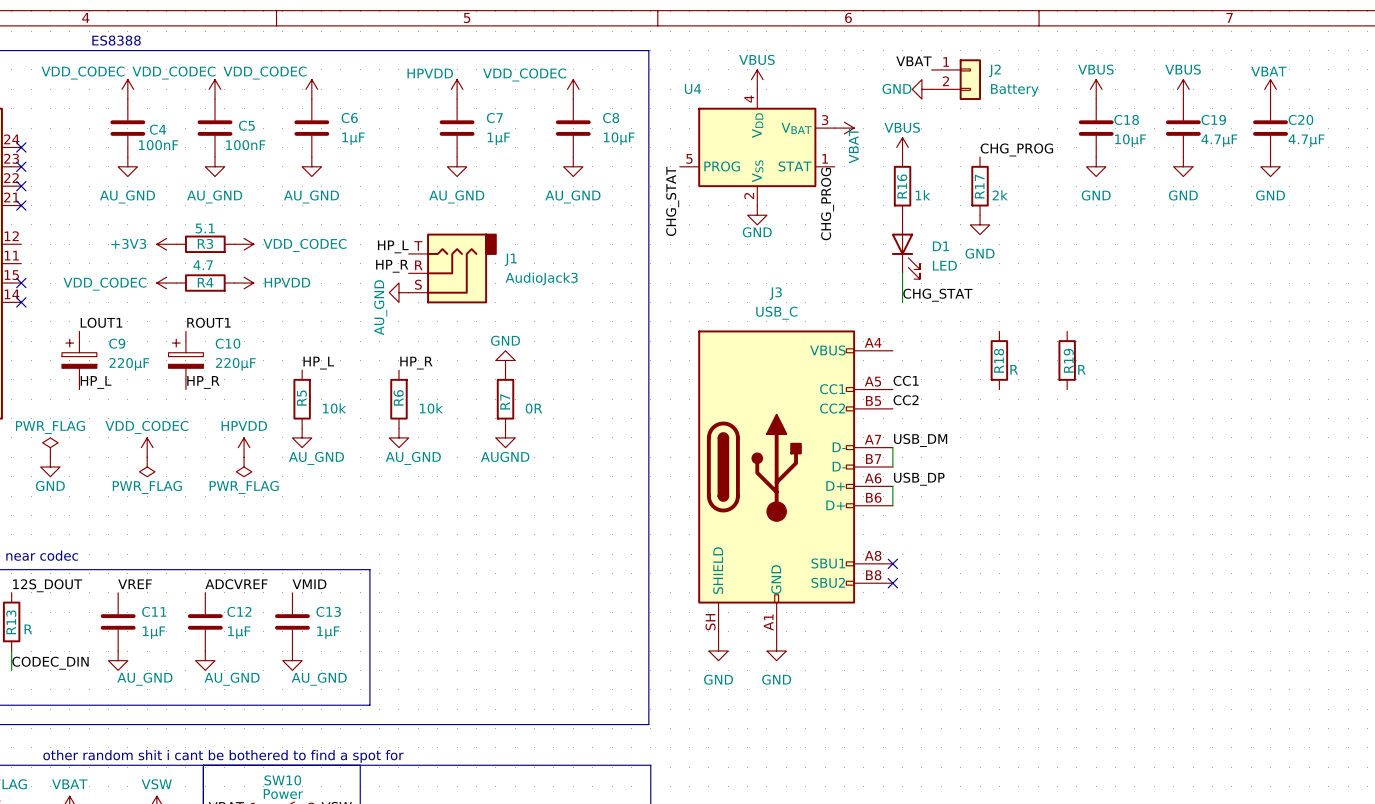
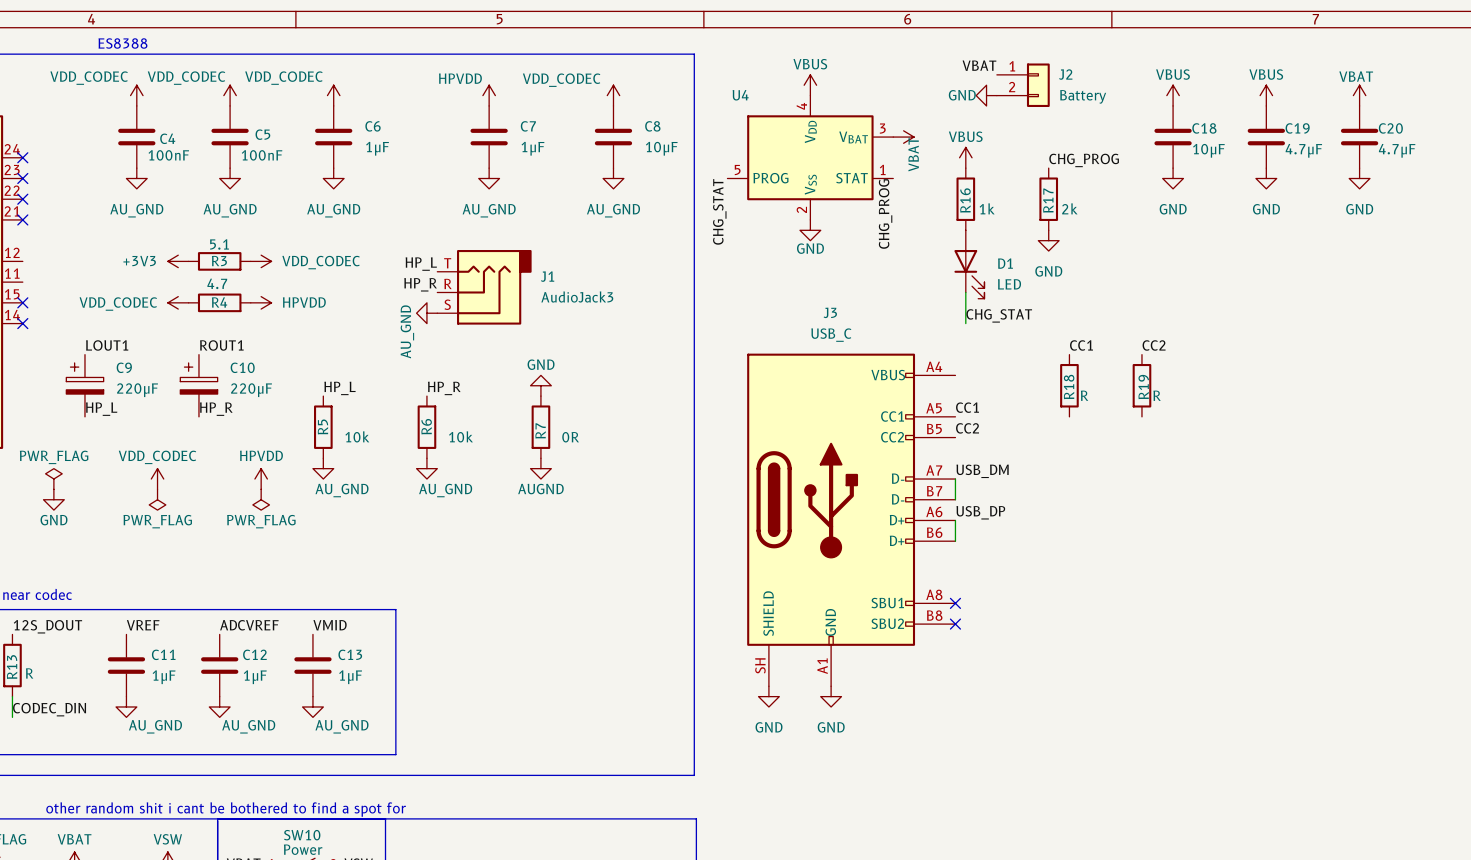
label: none -> CC1 (1081, 345)
label: none -> CC2 (1154, 345)

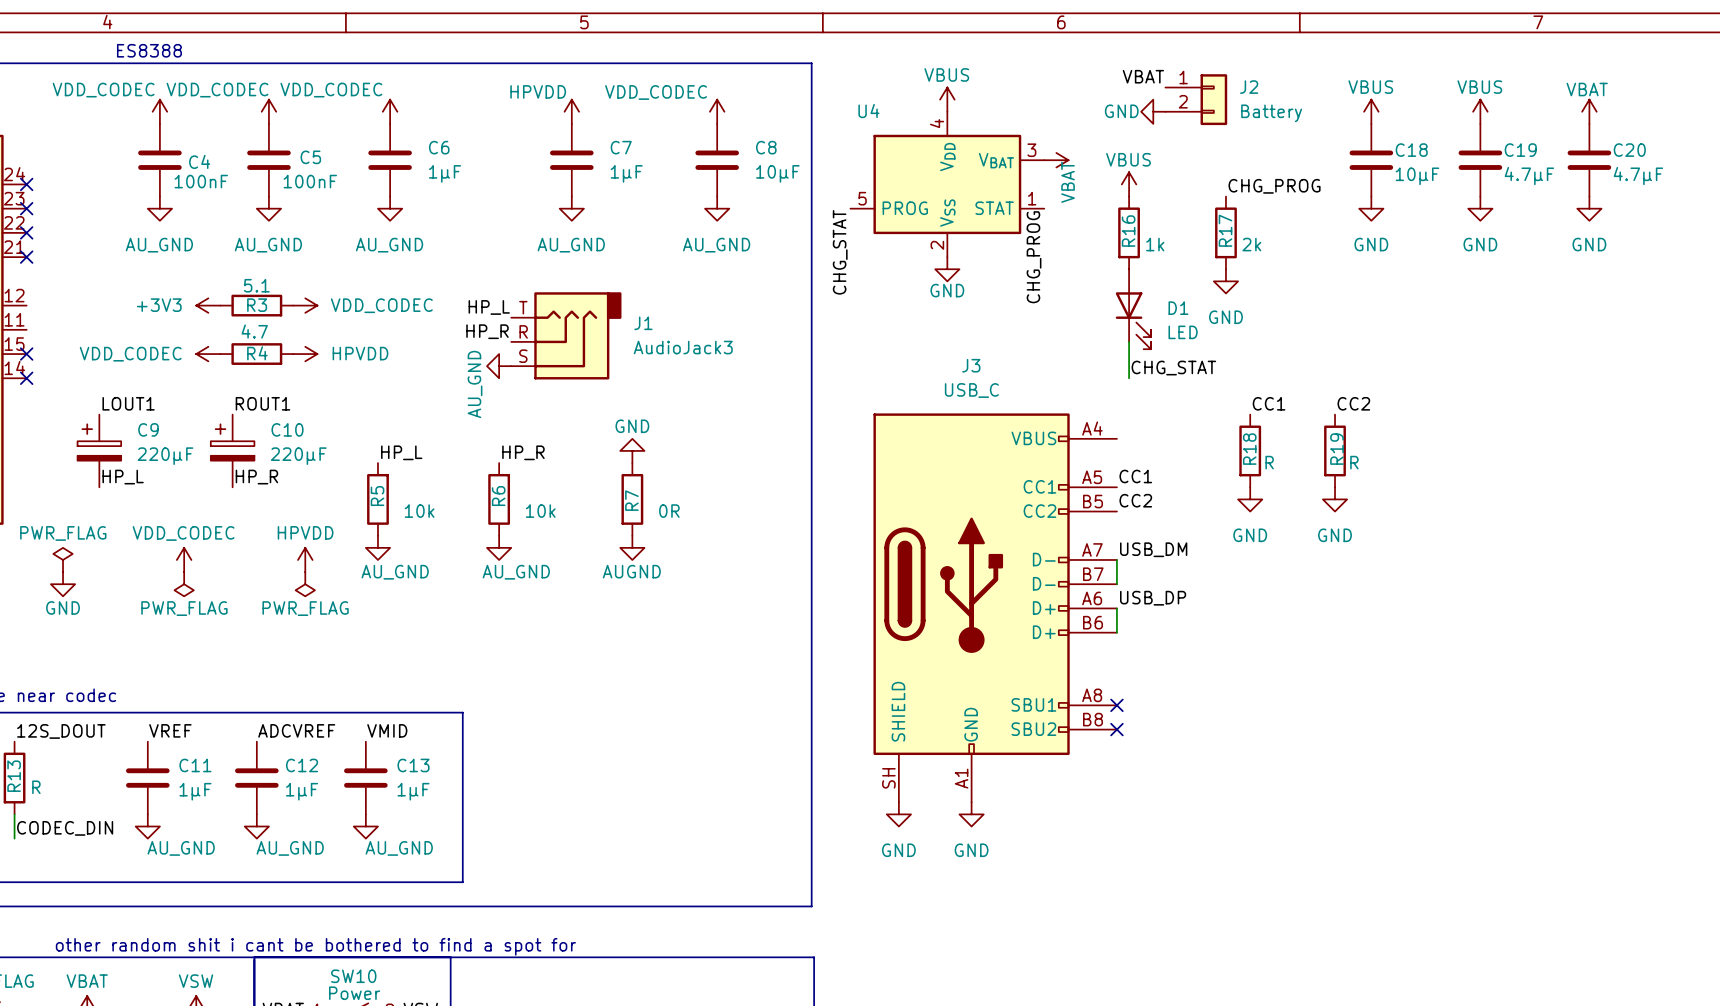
power symbol: none -> GND (1250, 499)
power symbol: none -> GND (1335, 499)

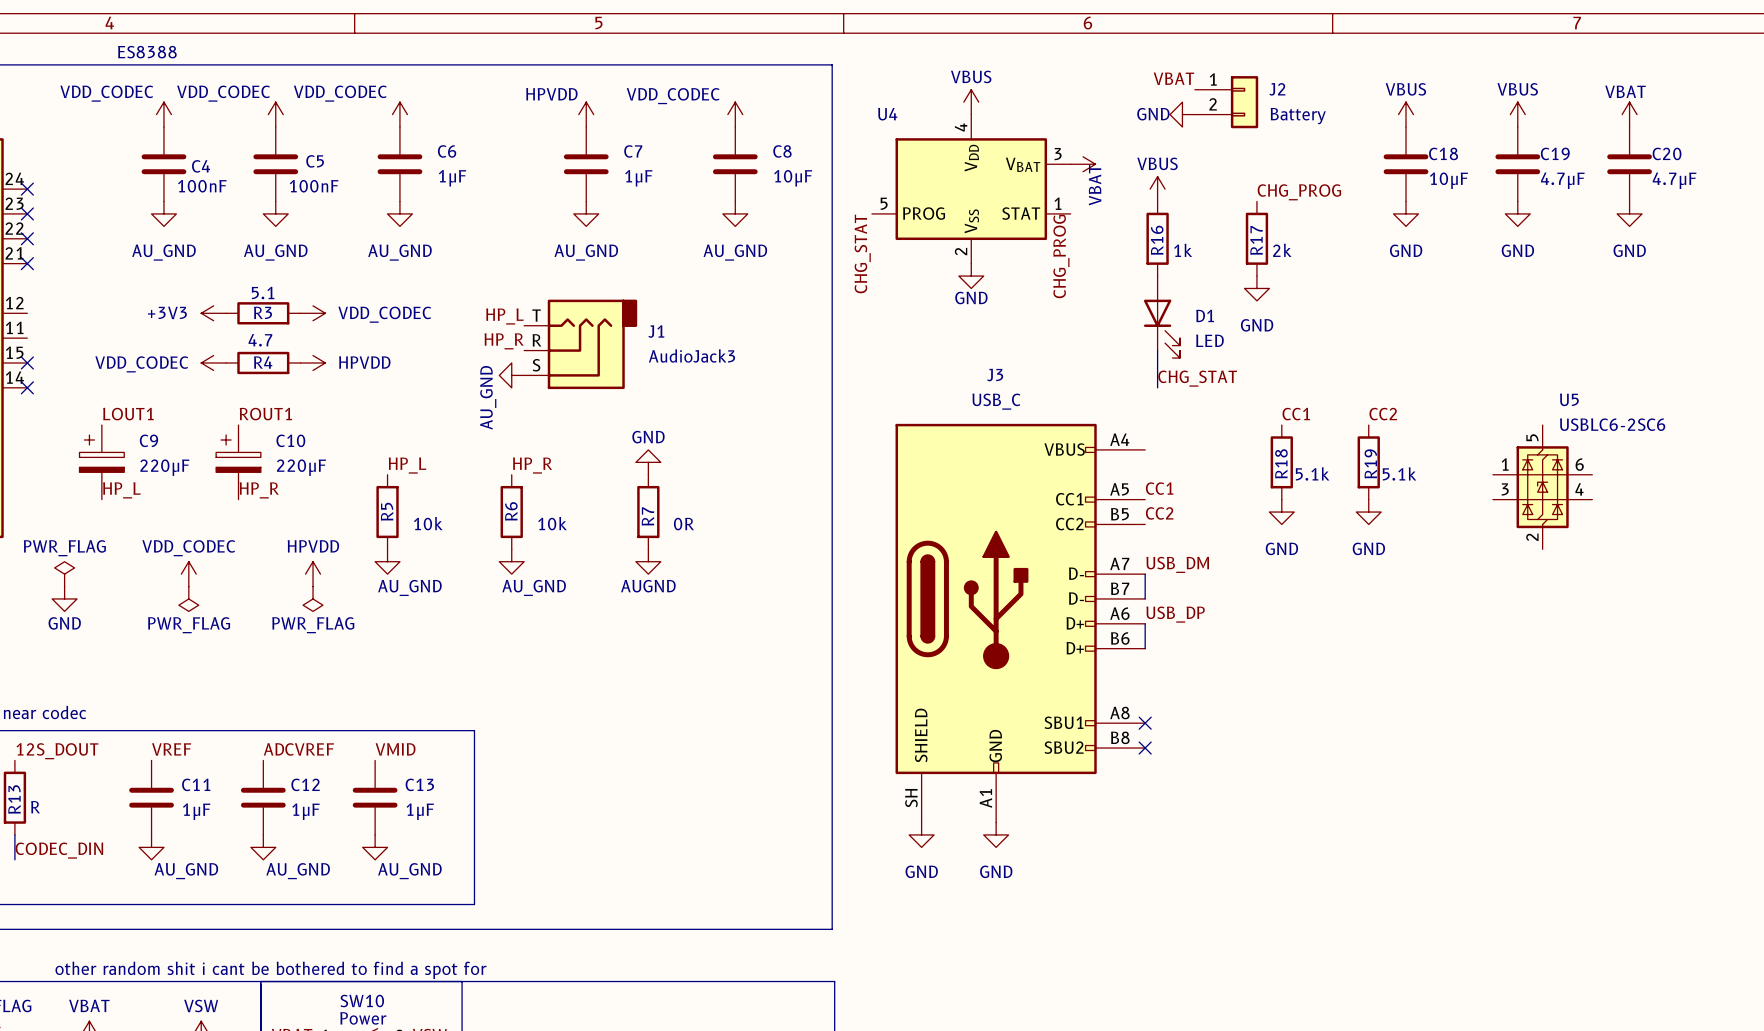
R18 value: R (1269, 462) -> 5.1k (1312, 473)
R19 value: R (1354, 462) -> 5.1k (1399, 473)
U5: none -> USBLC6-2SC6 (1542, 487)

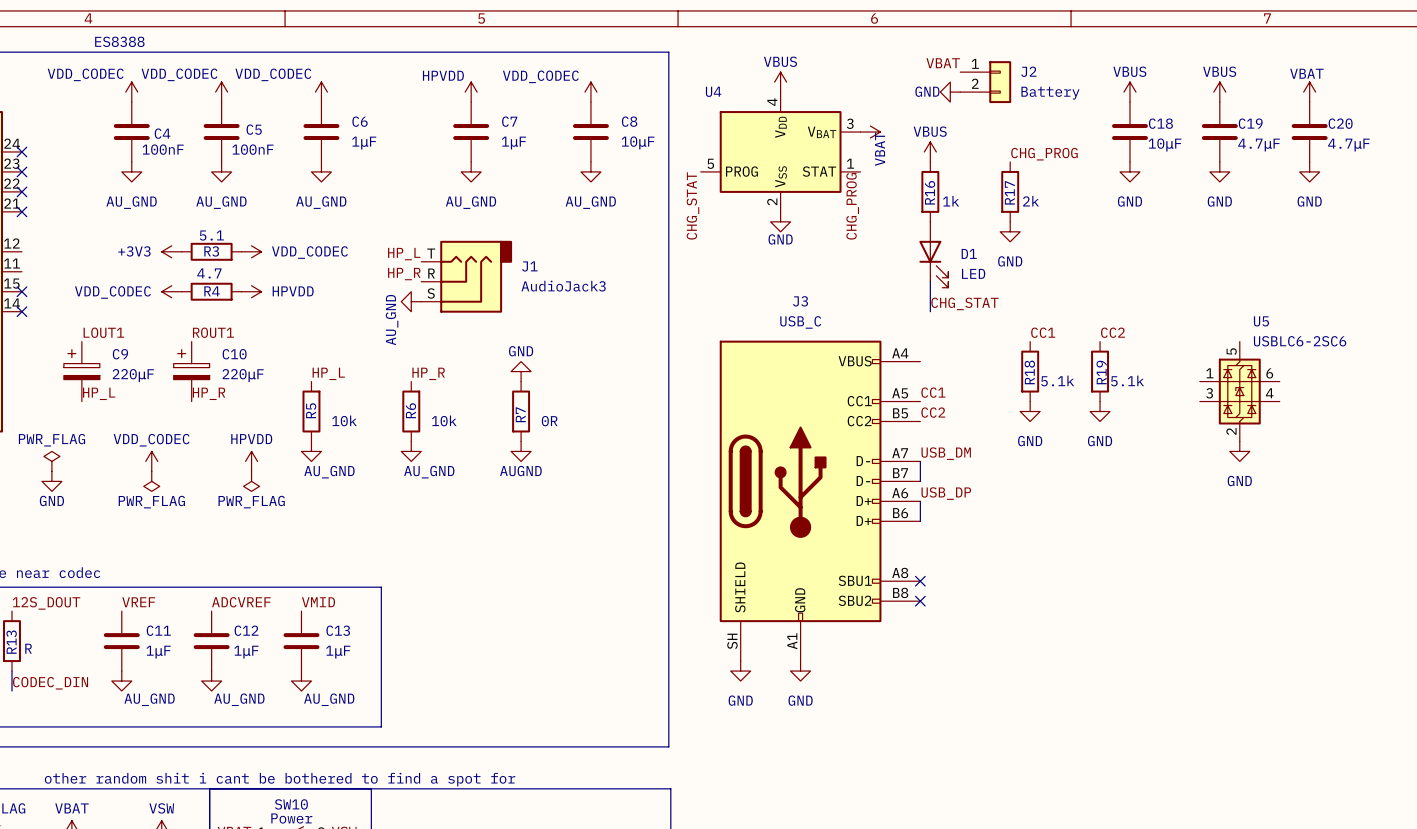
power symbol: none -> GND (1239, 451)

